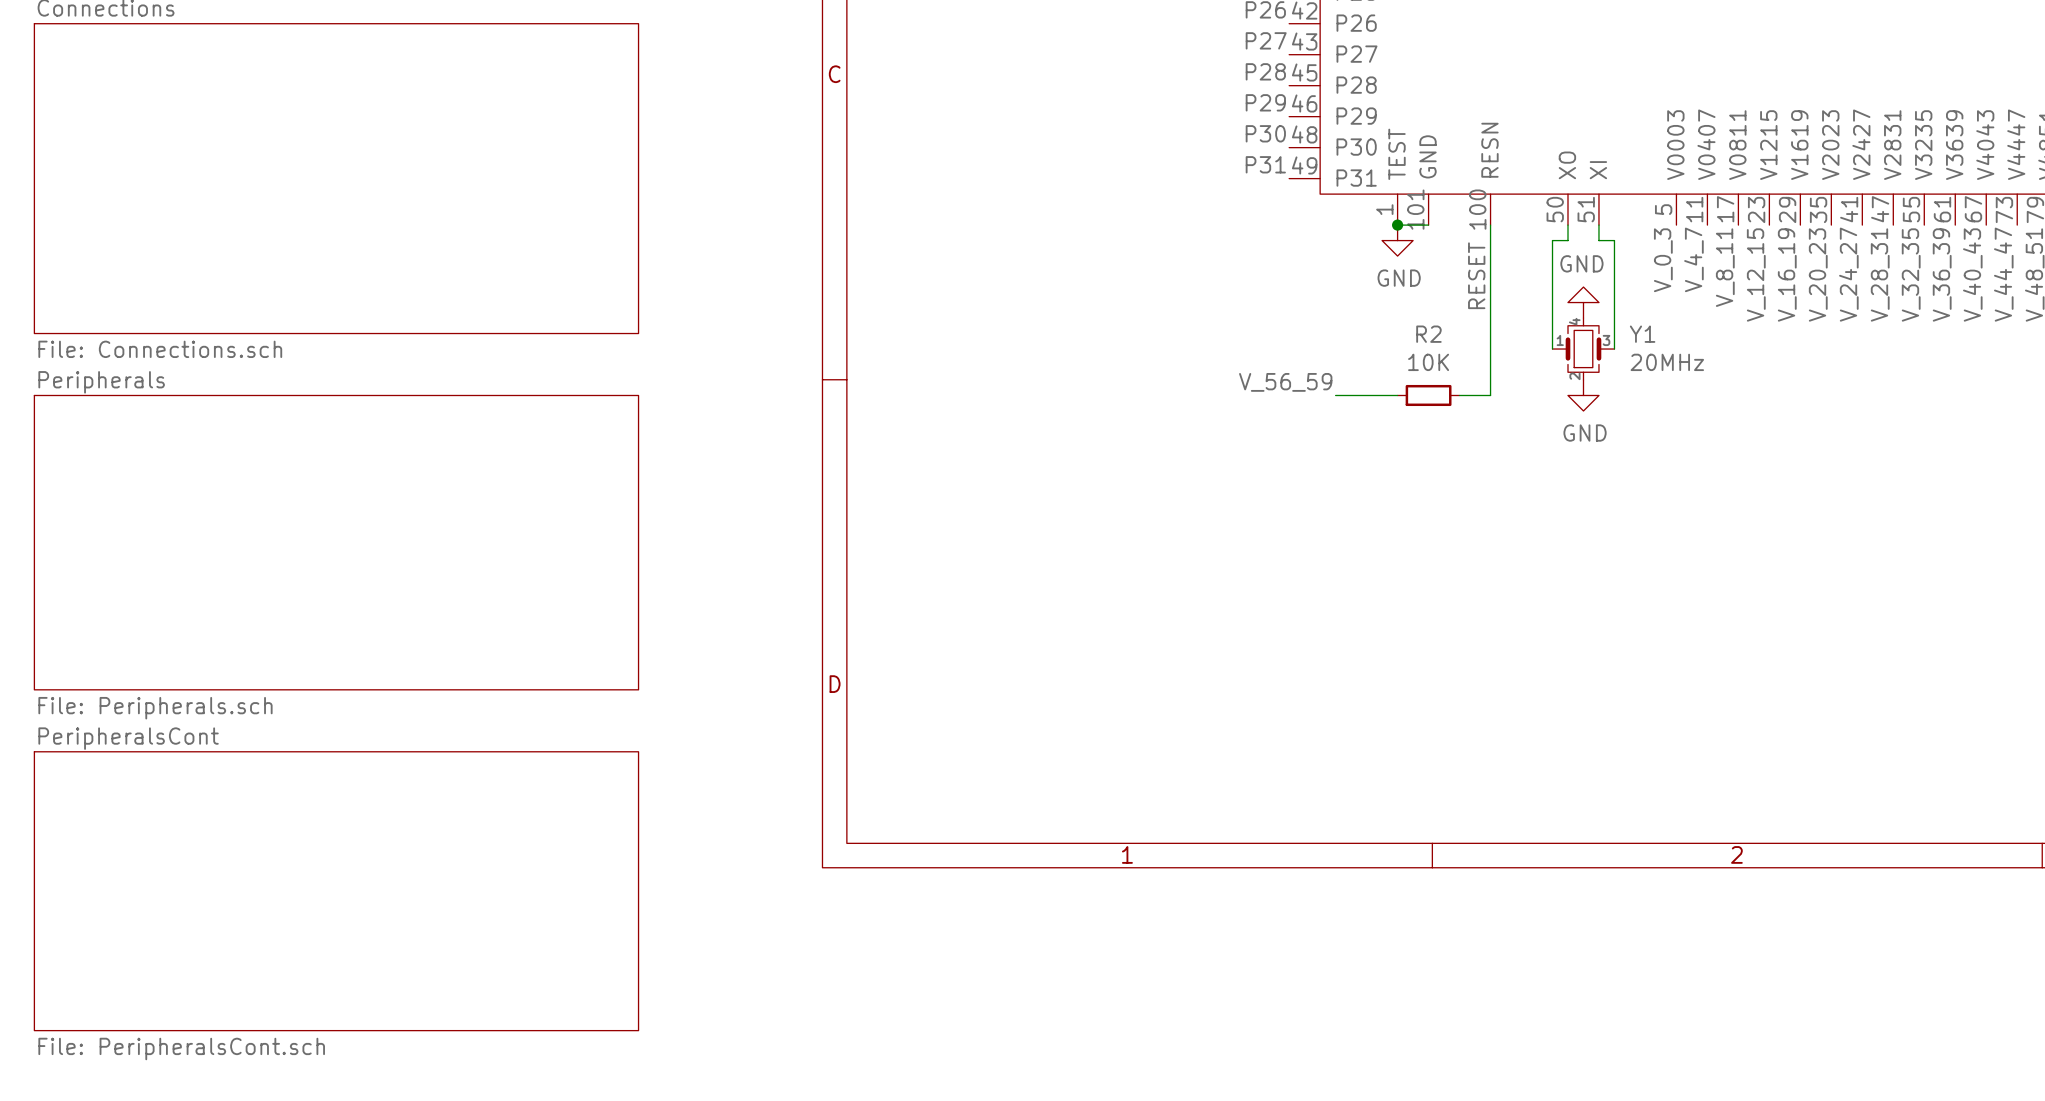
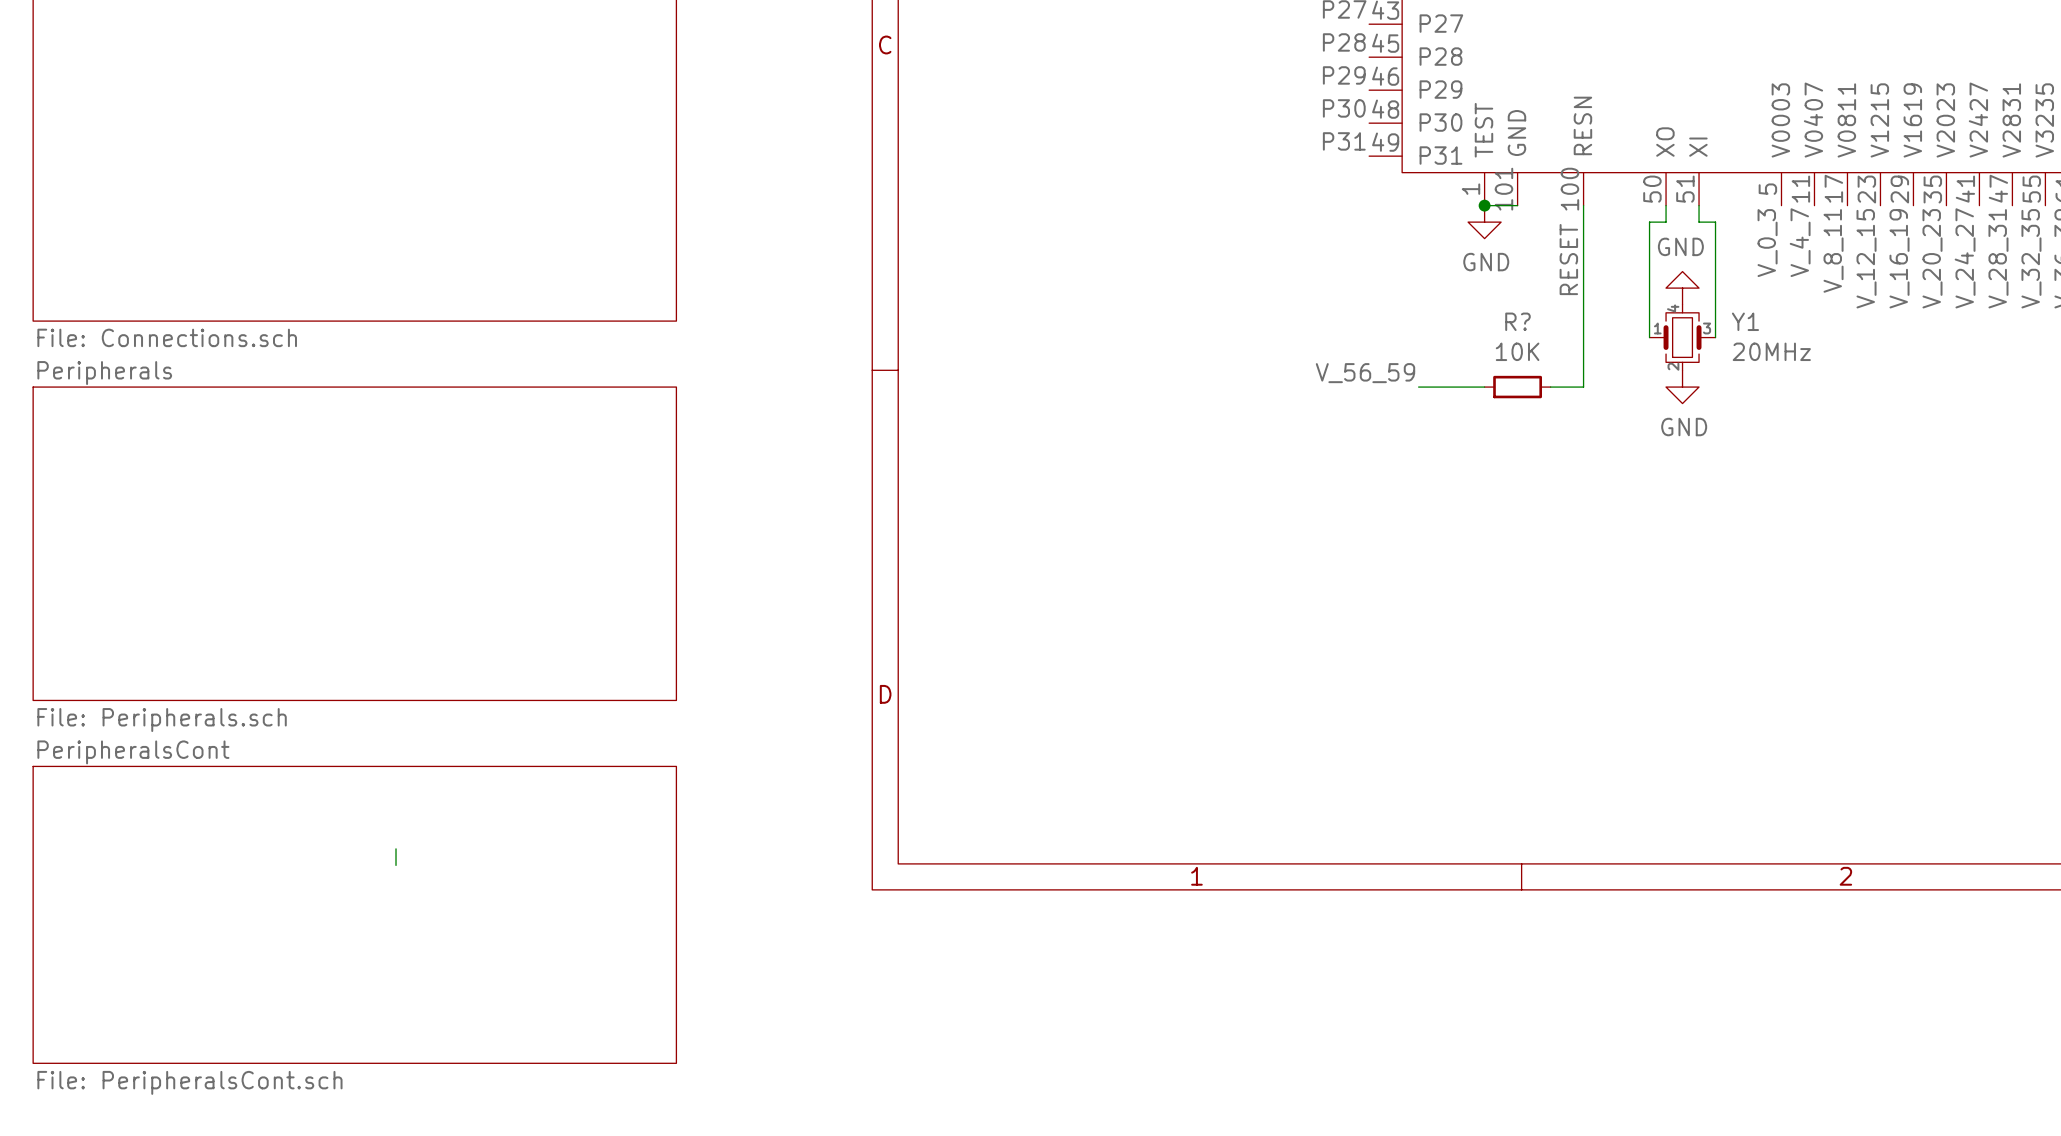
R2 name: R2 (1428, 334) -> R? (1517, 321)
wire: none -> (396, 848) (396, 865)

